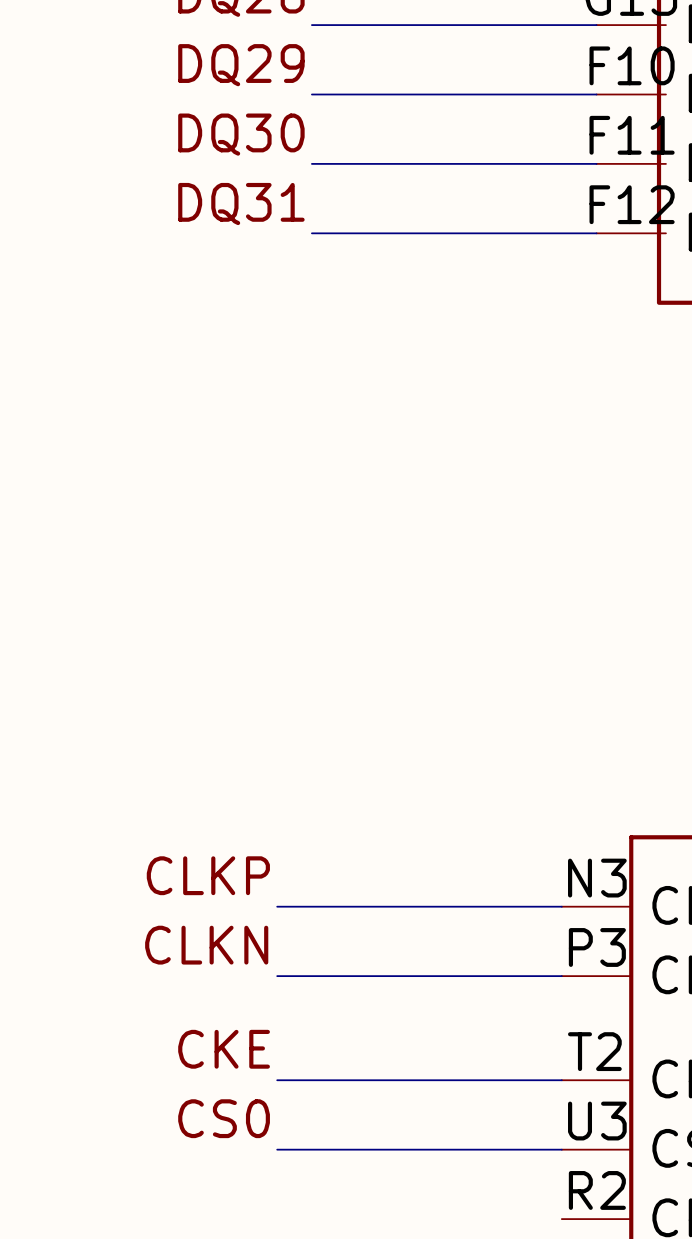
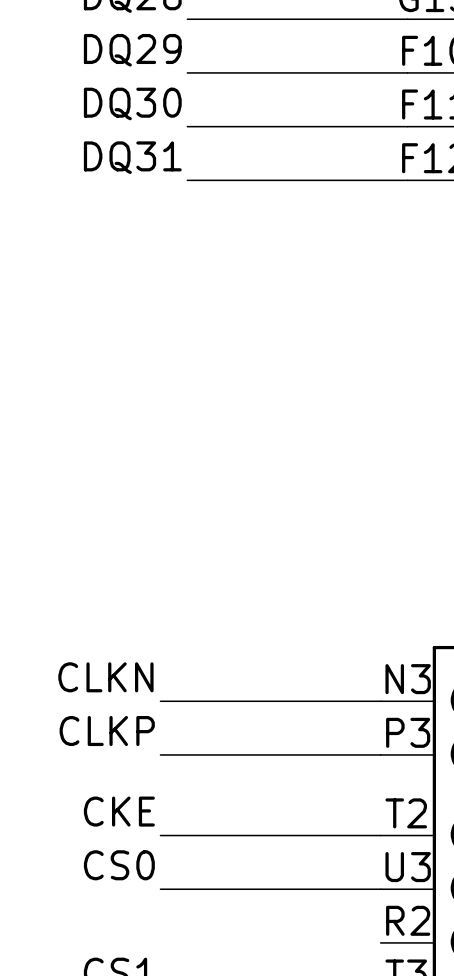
label: CLKP (208, 875) -> CLKN (105, 677)
label: CLKN (206, 945) -> CLKP (107, 731)

